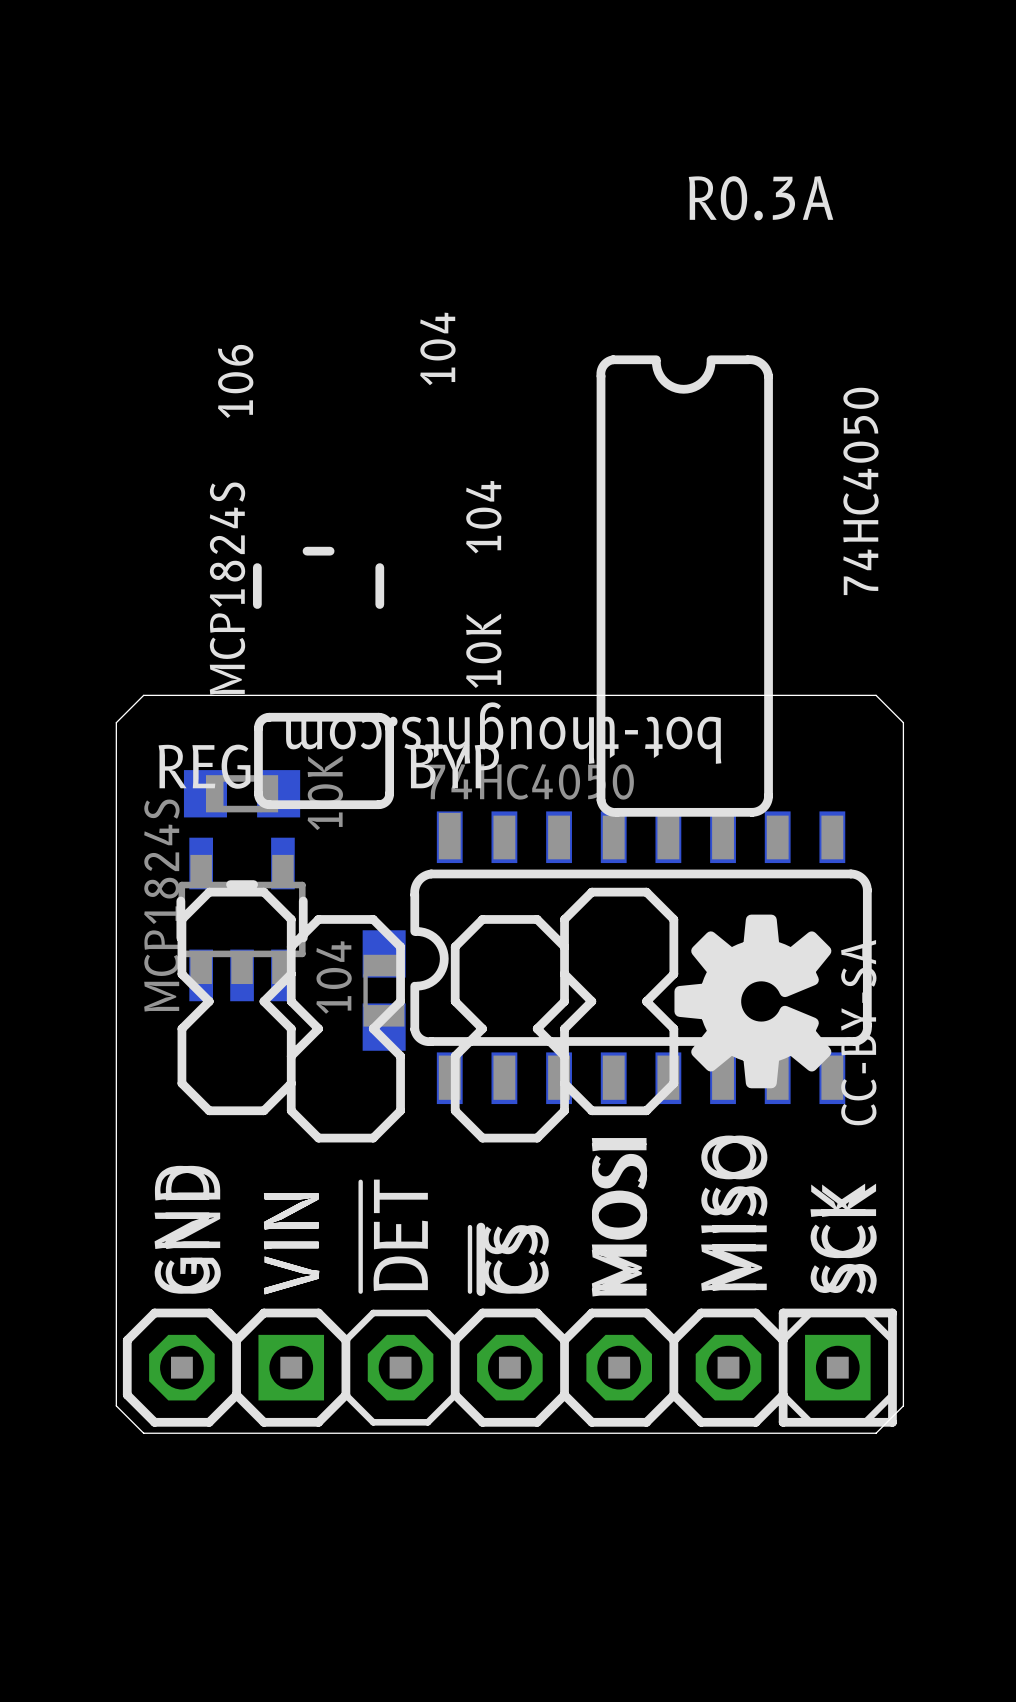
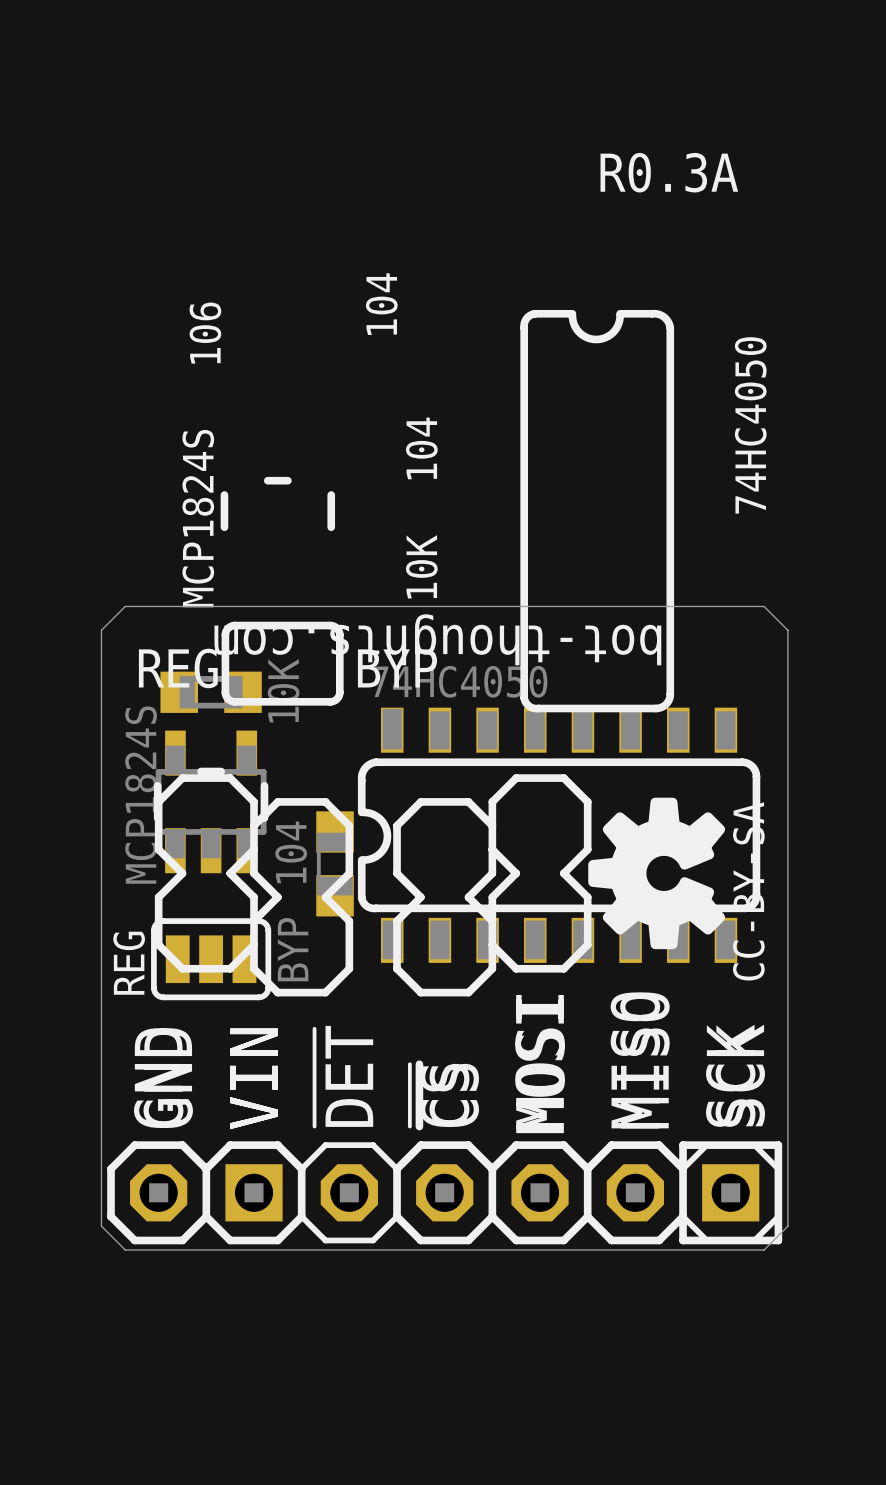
REG: none -> BYP (211, 959)

